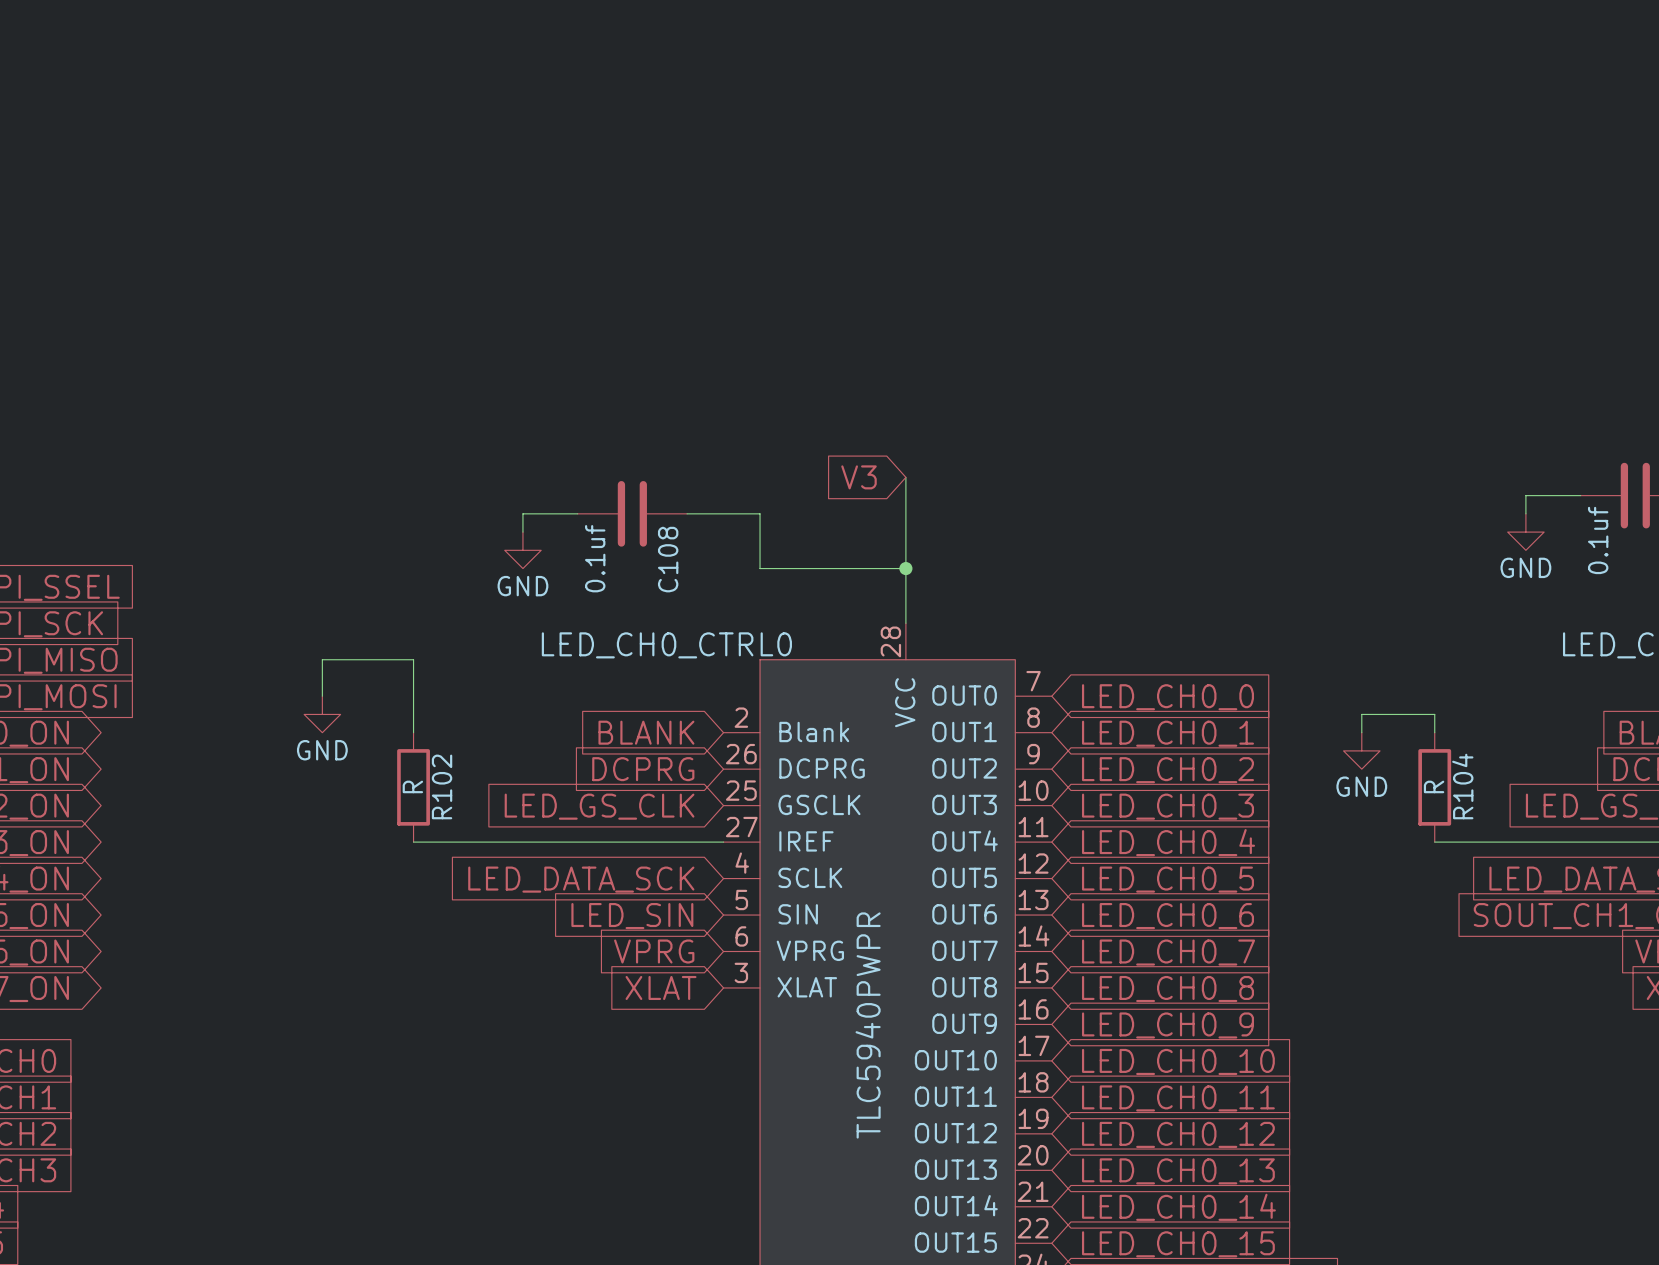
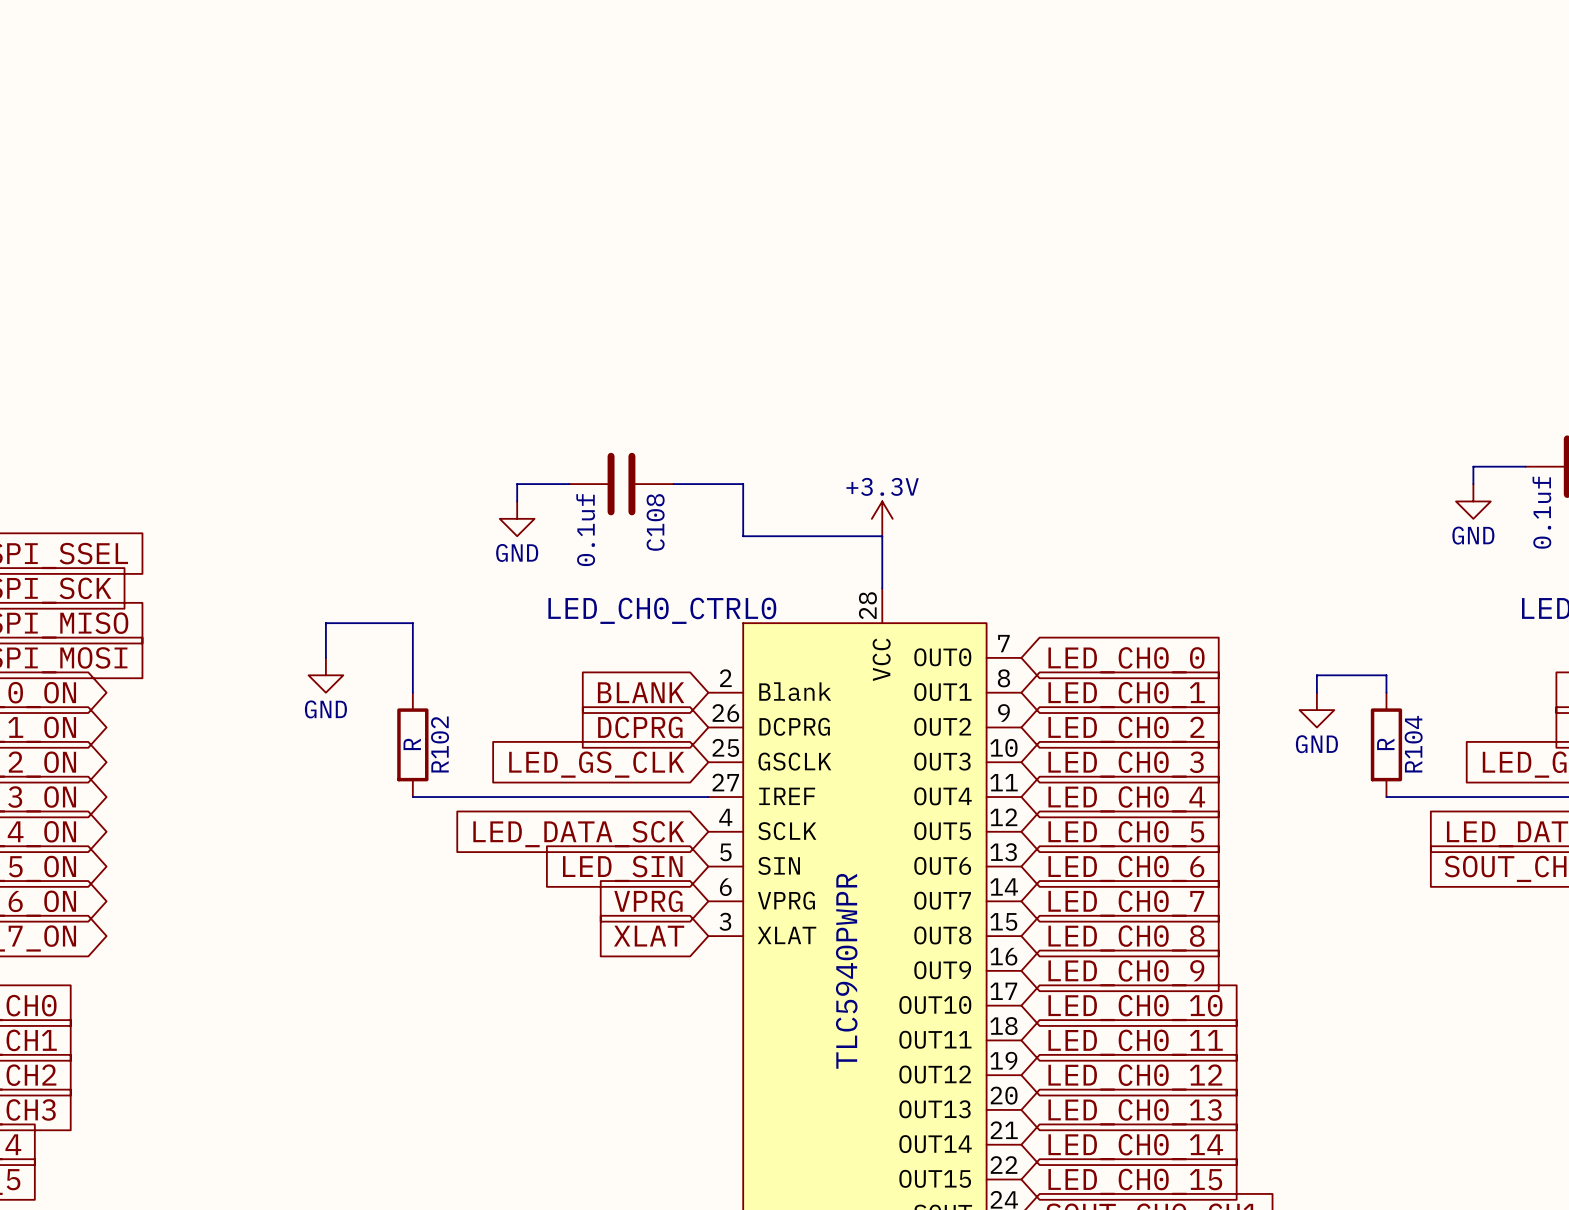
global label: V3 (859, 477) -> none
wire: (905, 477) (905, 568) -> none
power symbol: none -> +3.3V (882, 518)
junction: (905, 568) -> none

